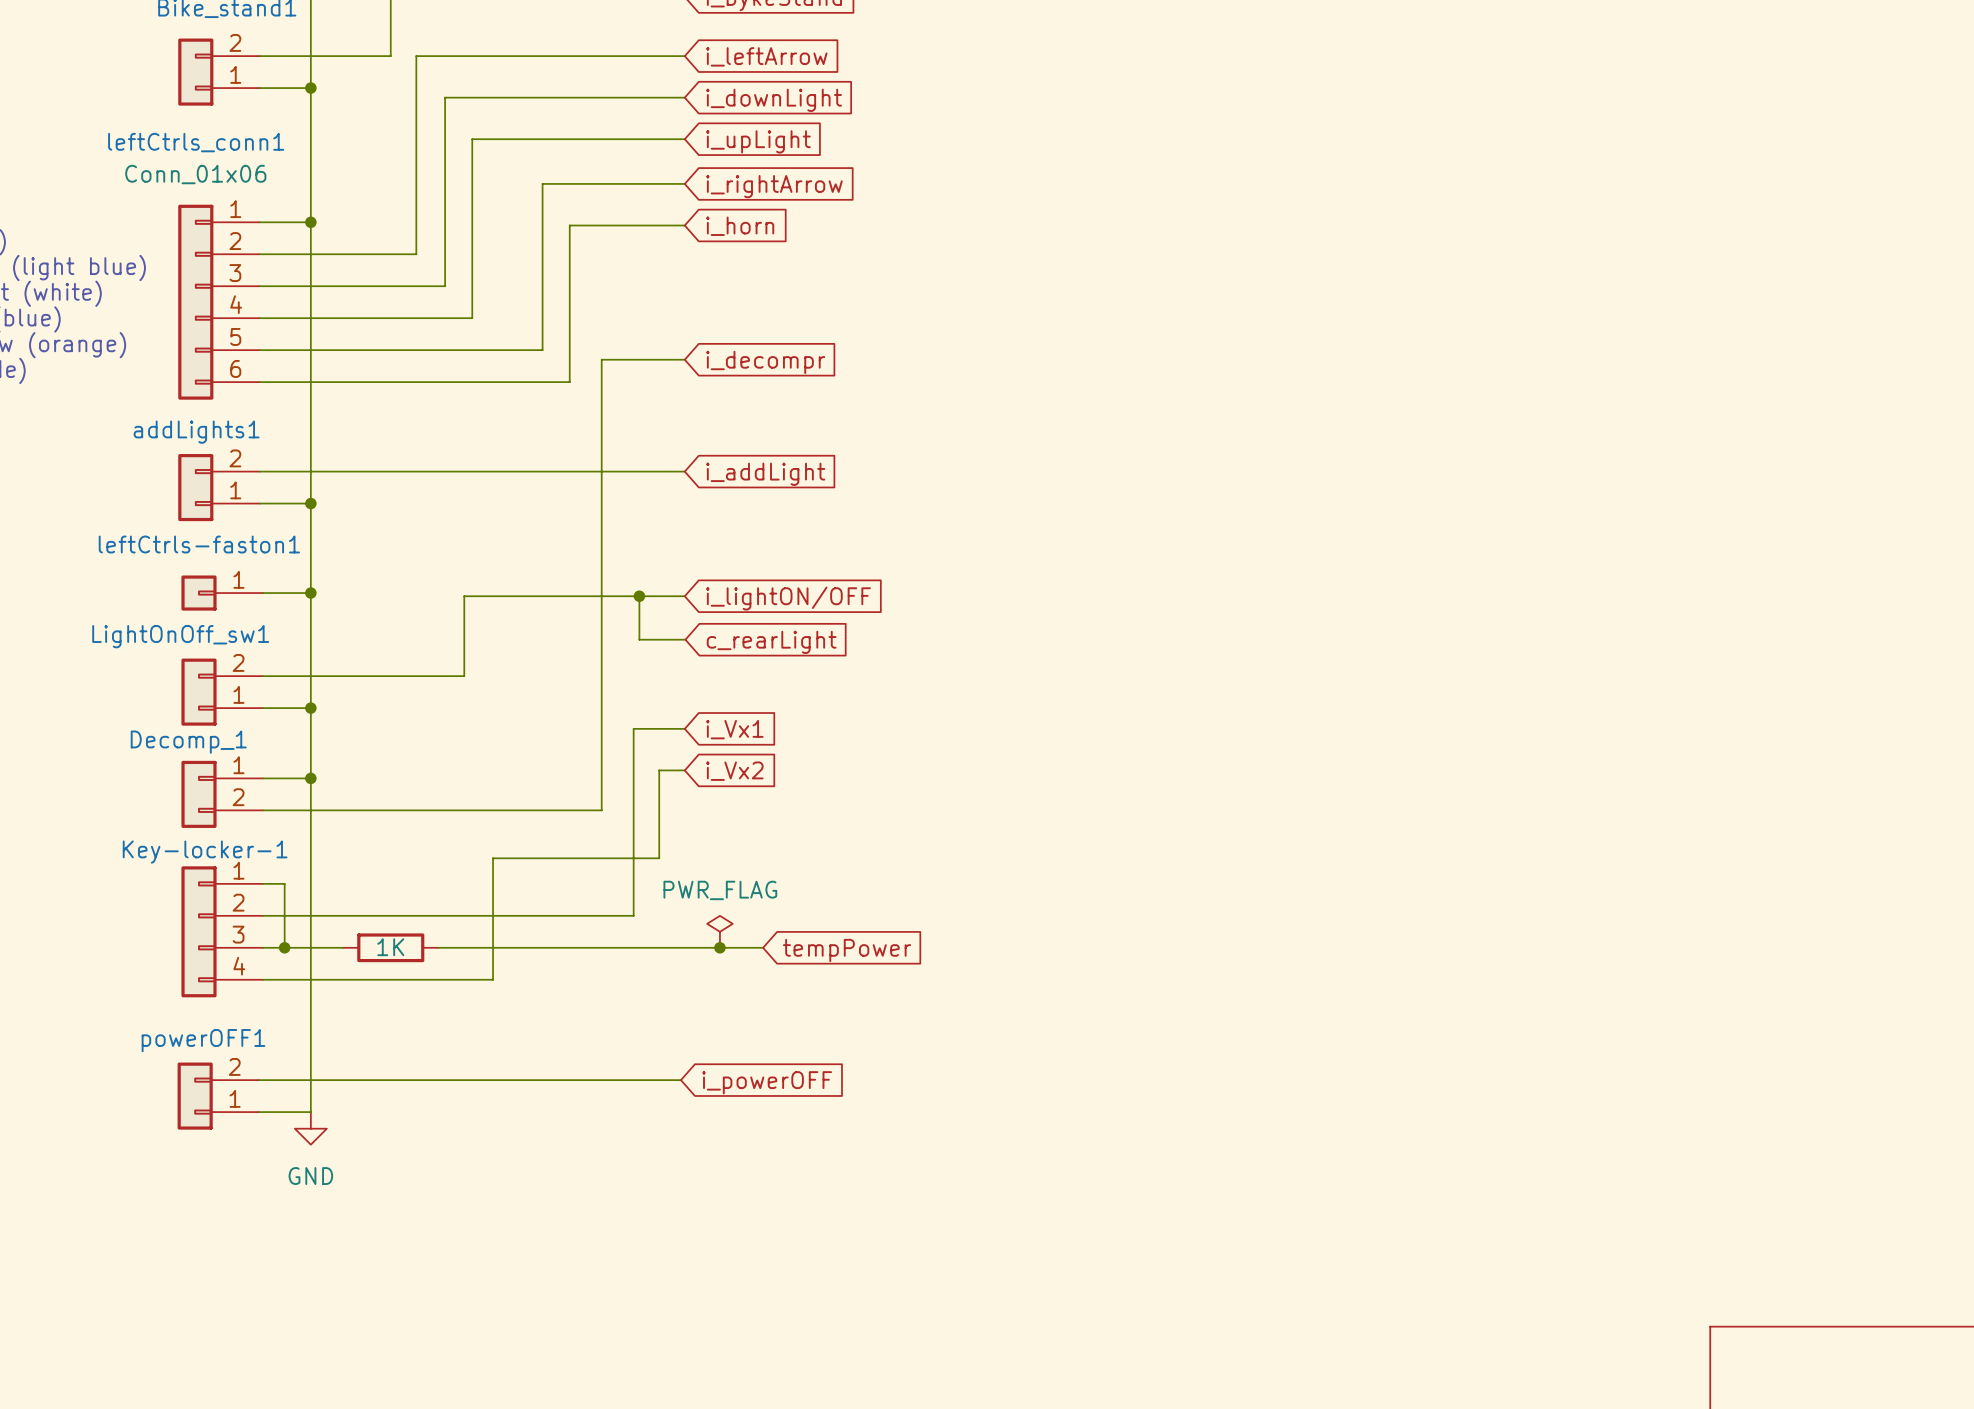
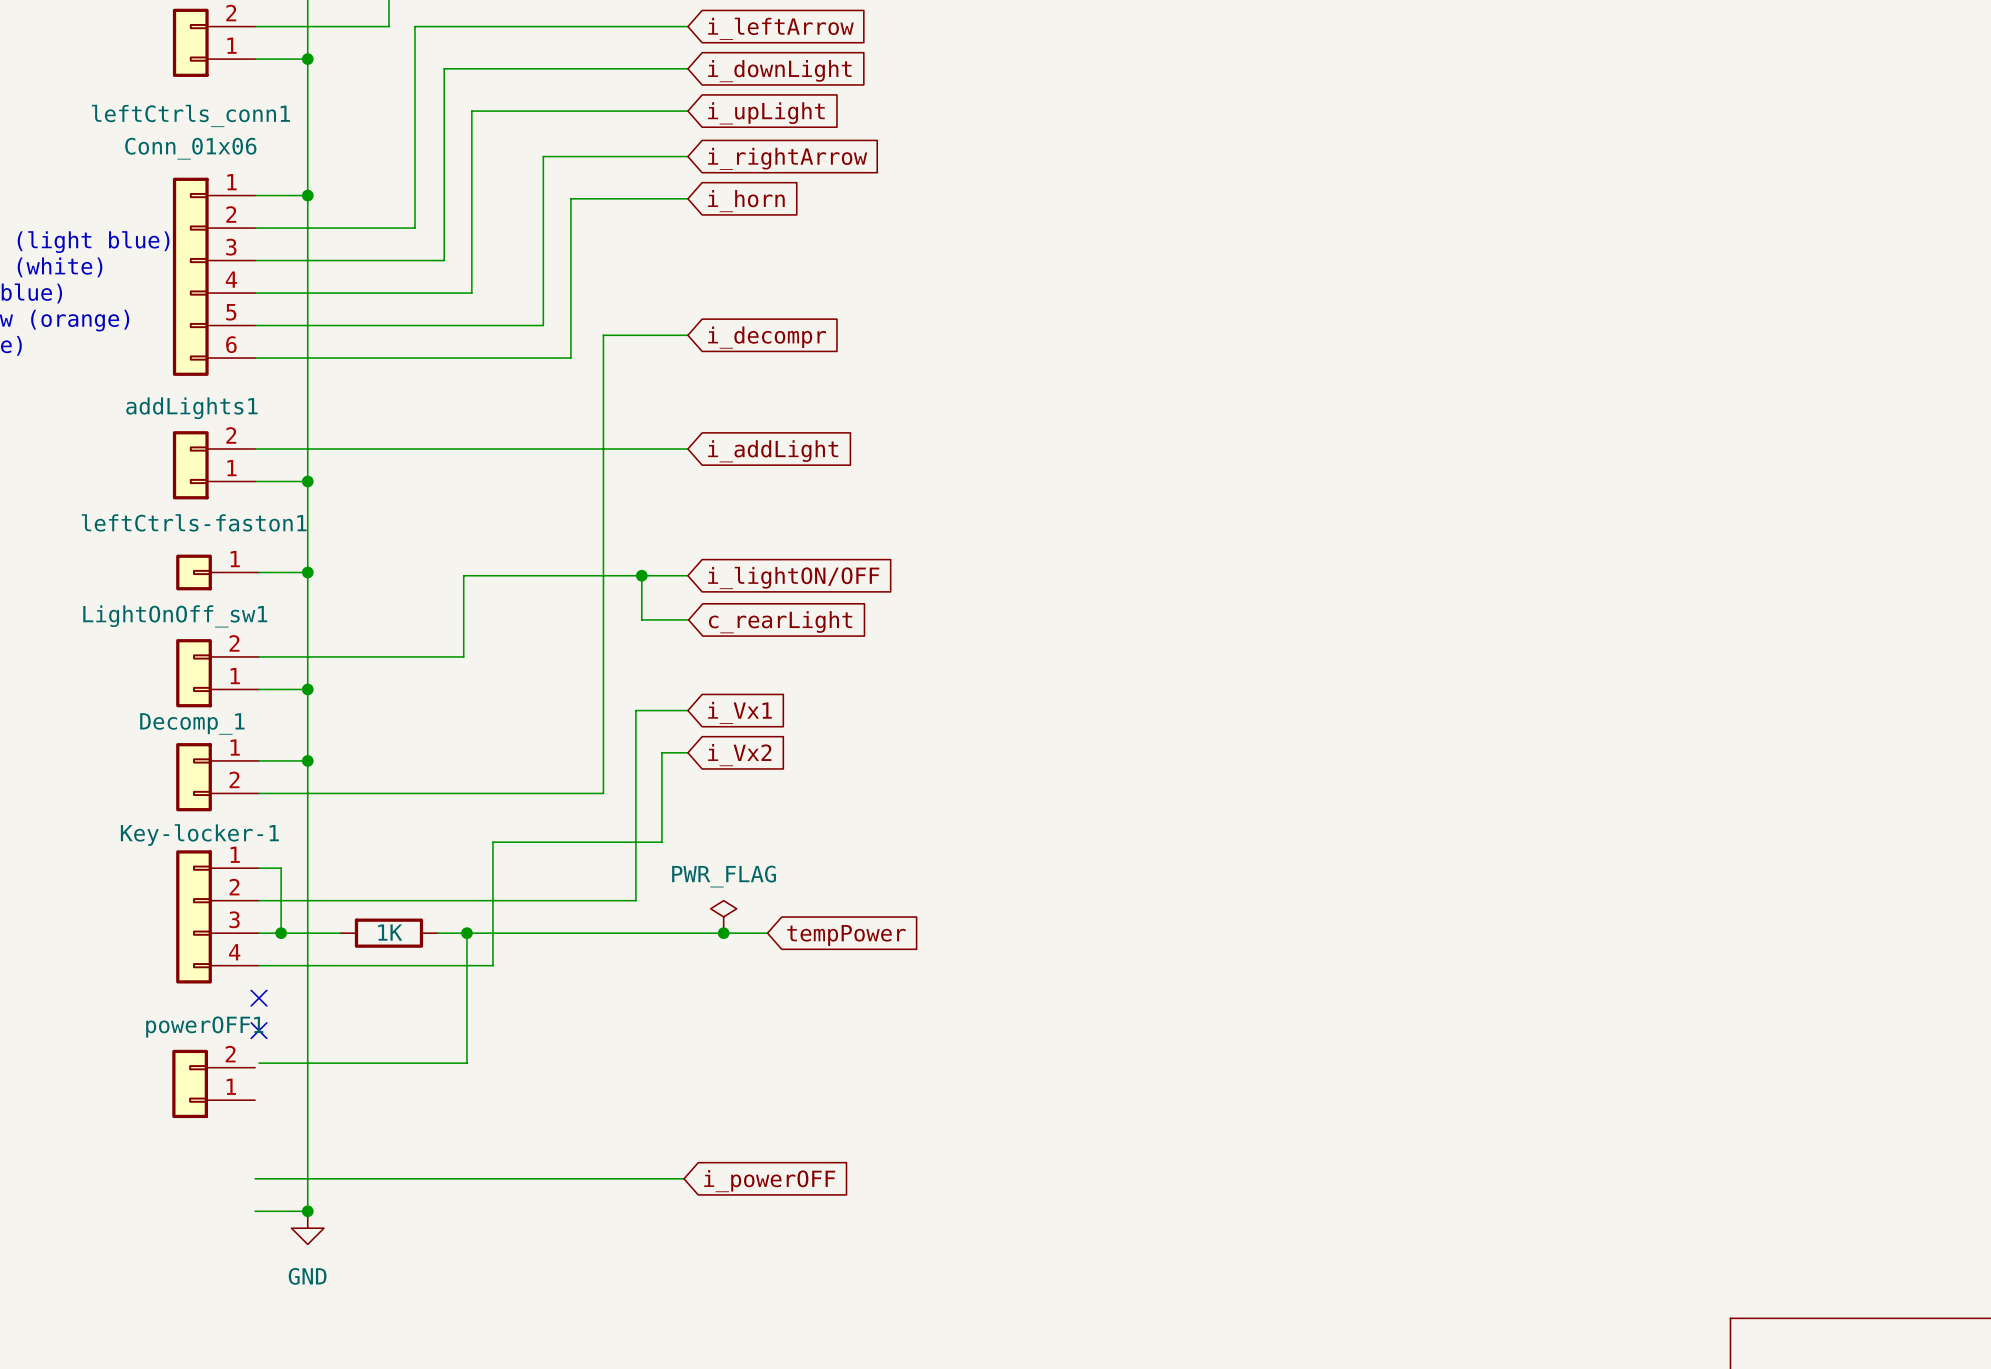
wire: none -> (466, 933) (466, 1063) (259, 1063)
junction: none -> (466, 933)
no-connect mark: none -> (259, 998)
no-connect mark: none -> (259, 1030)
wire: (259, 1080) (680, 1080) -> (255, 1178) (684, 1178)
global label position: i_powerOFF (767, 1082) -> i_powerOFF (769, 1181)
wire: (259, 1112) (310, 1112) -> (255, 1211) (307, 1211)
wire: none -> (307, 1100) (307, 1211)
power symbol position: GND (310, 1128) -> GND (307, 1228)
junction: none -> (307, 1211)

